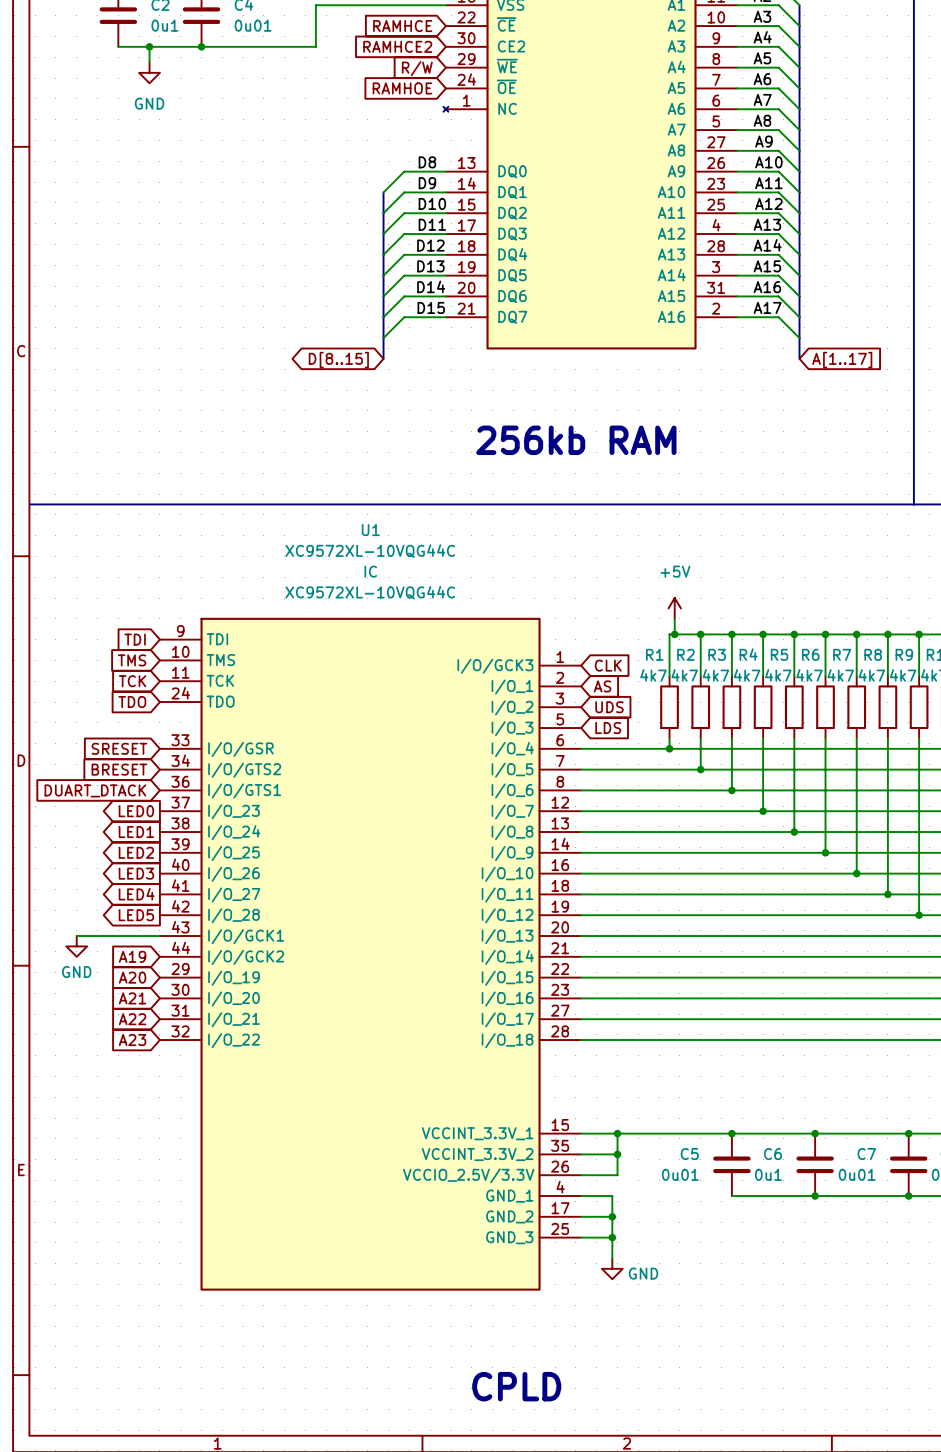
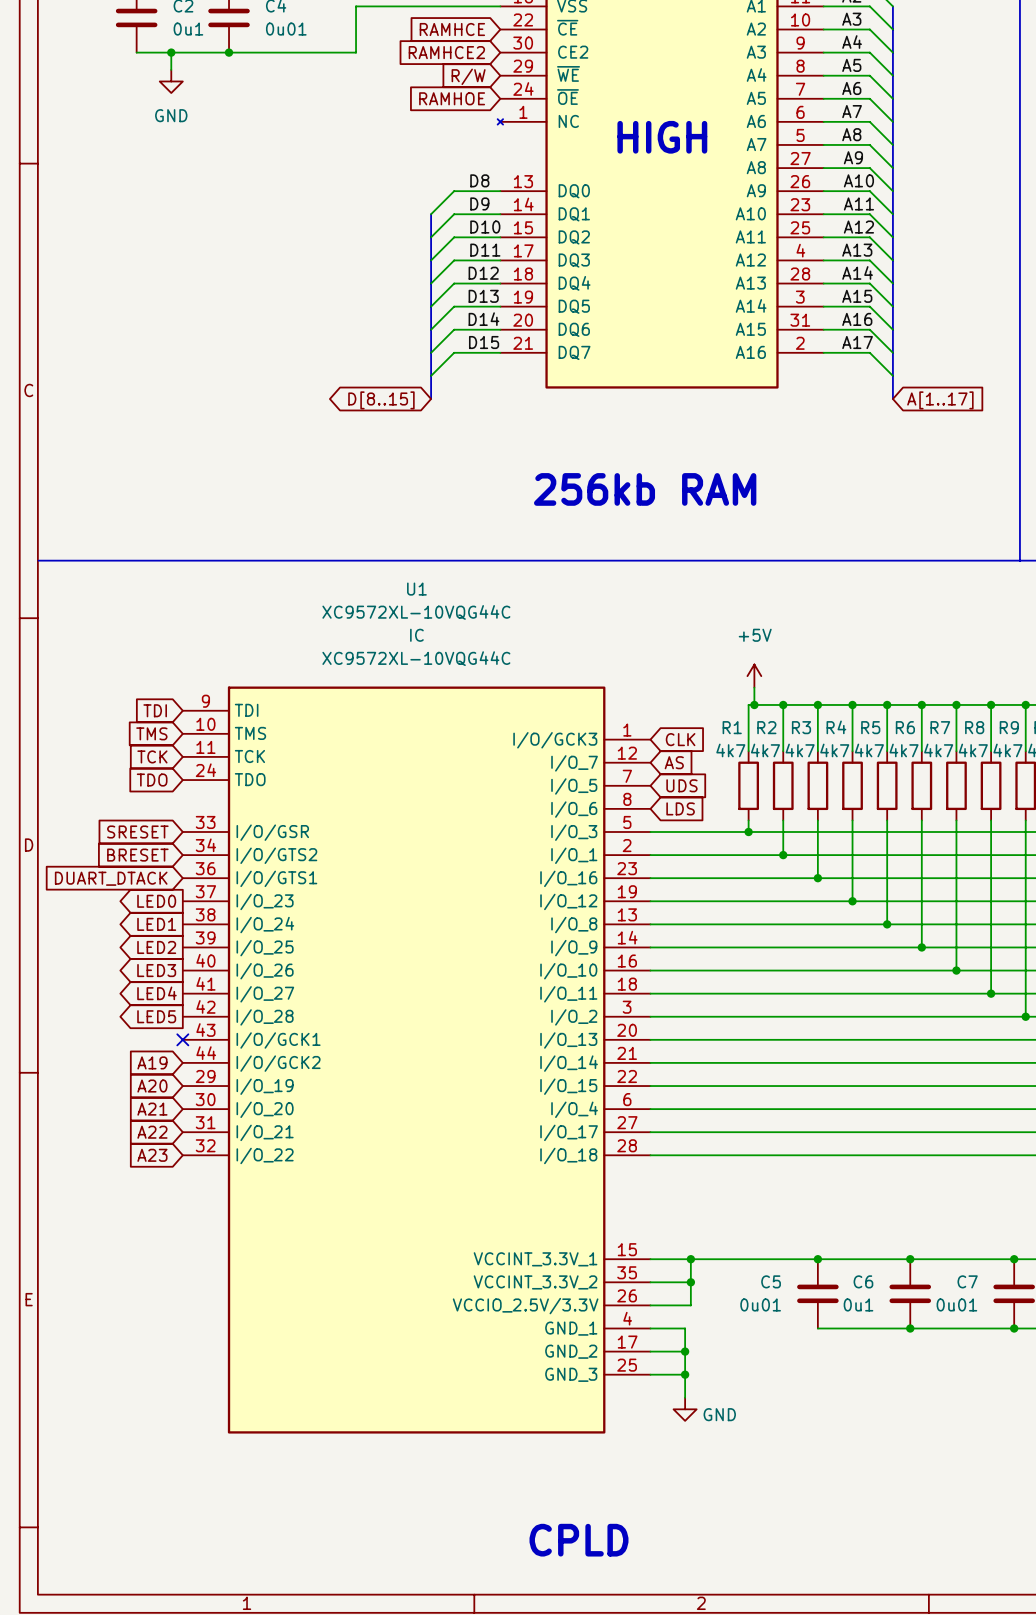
text: none -> HIGH (662, 137)
U1 symbol: [159, 617, 582, 1291] -> [182, 686, 651, 1434]
wire: (76, 936) (159, 936) -> none
no-connect mark: none -> (182, 1039)
power symbol: GND (76, 946) -> none

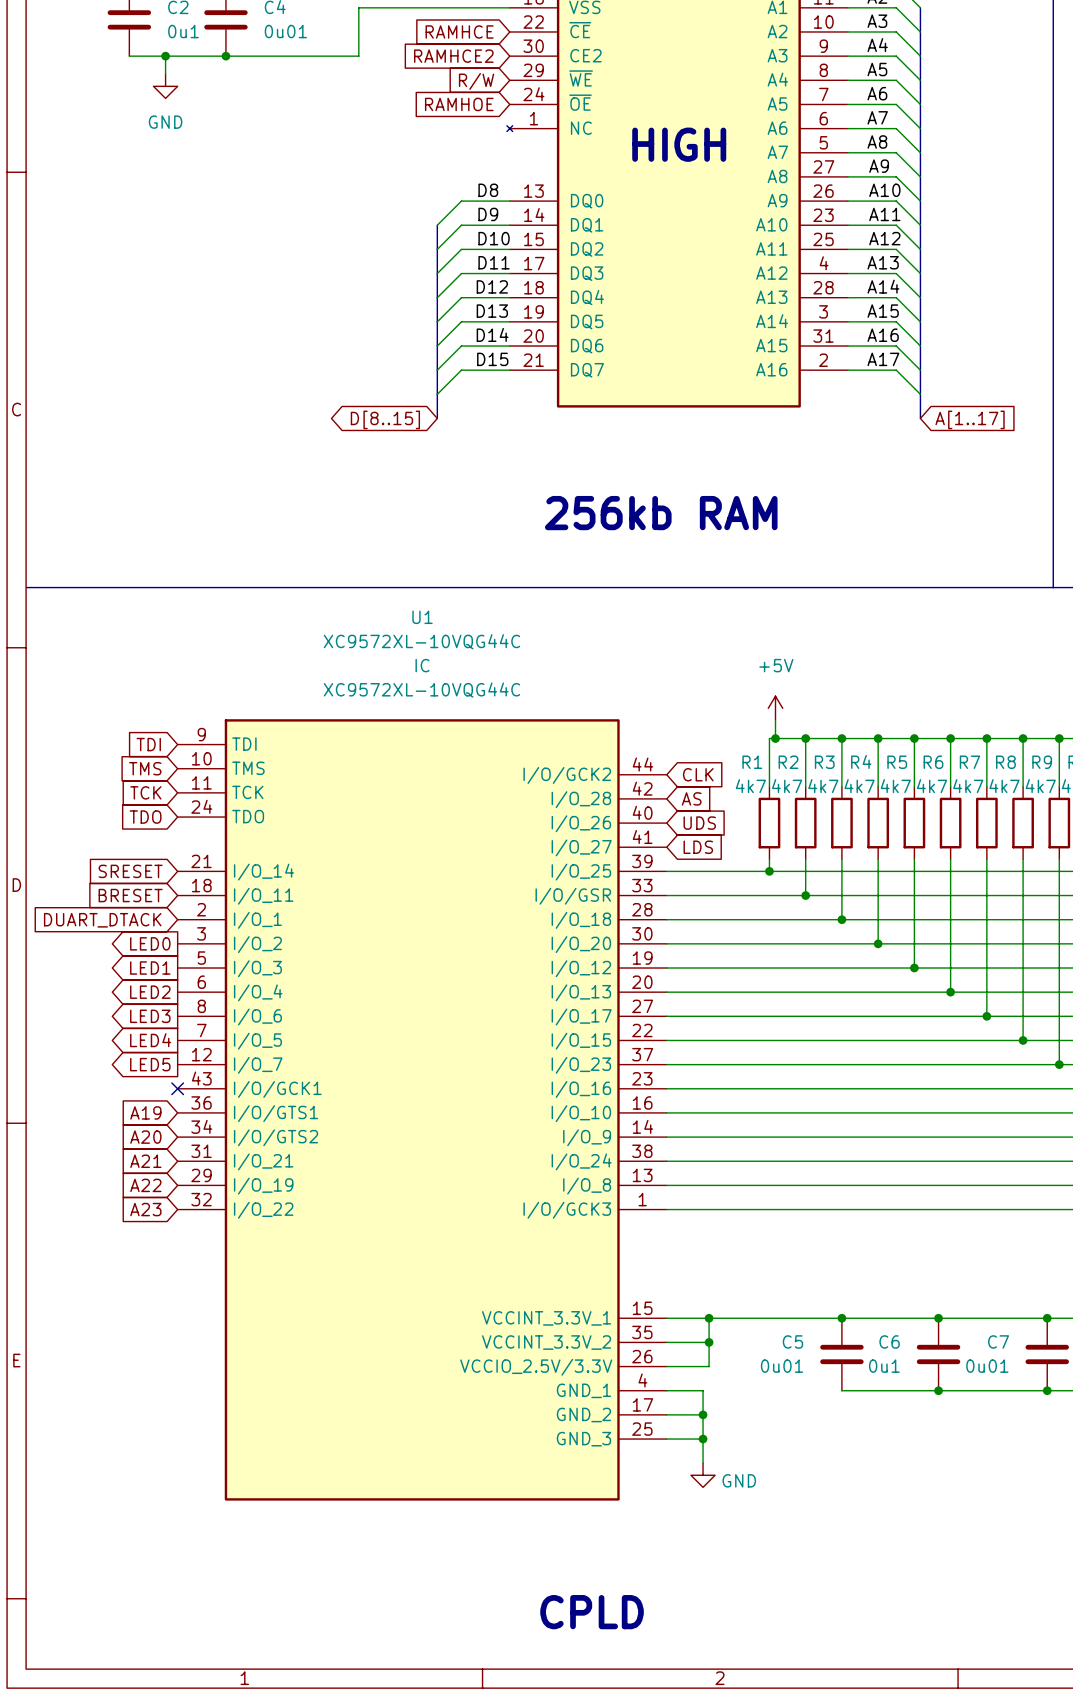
U1 symbol: [182, 686, 651, 1434] -> [177, 719, 667, 1501]

